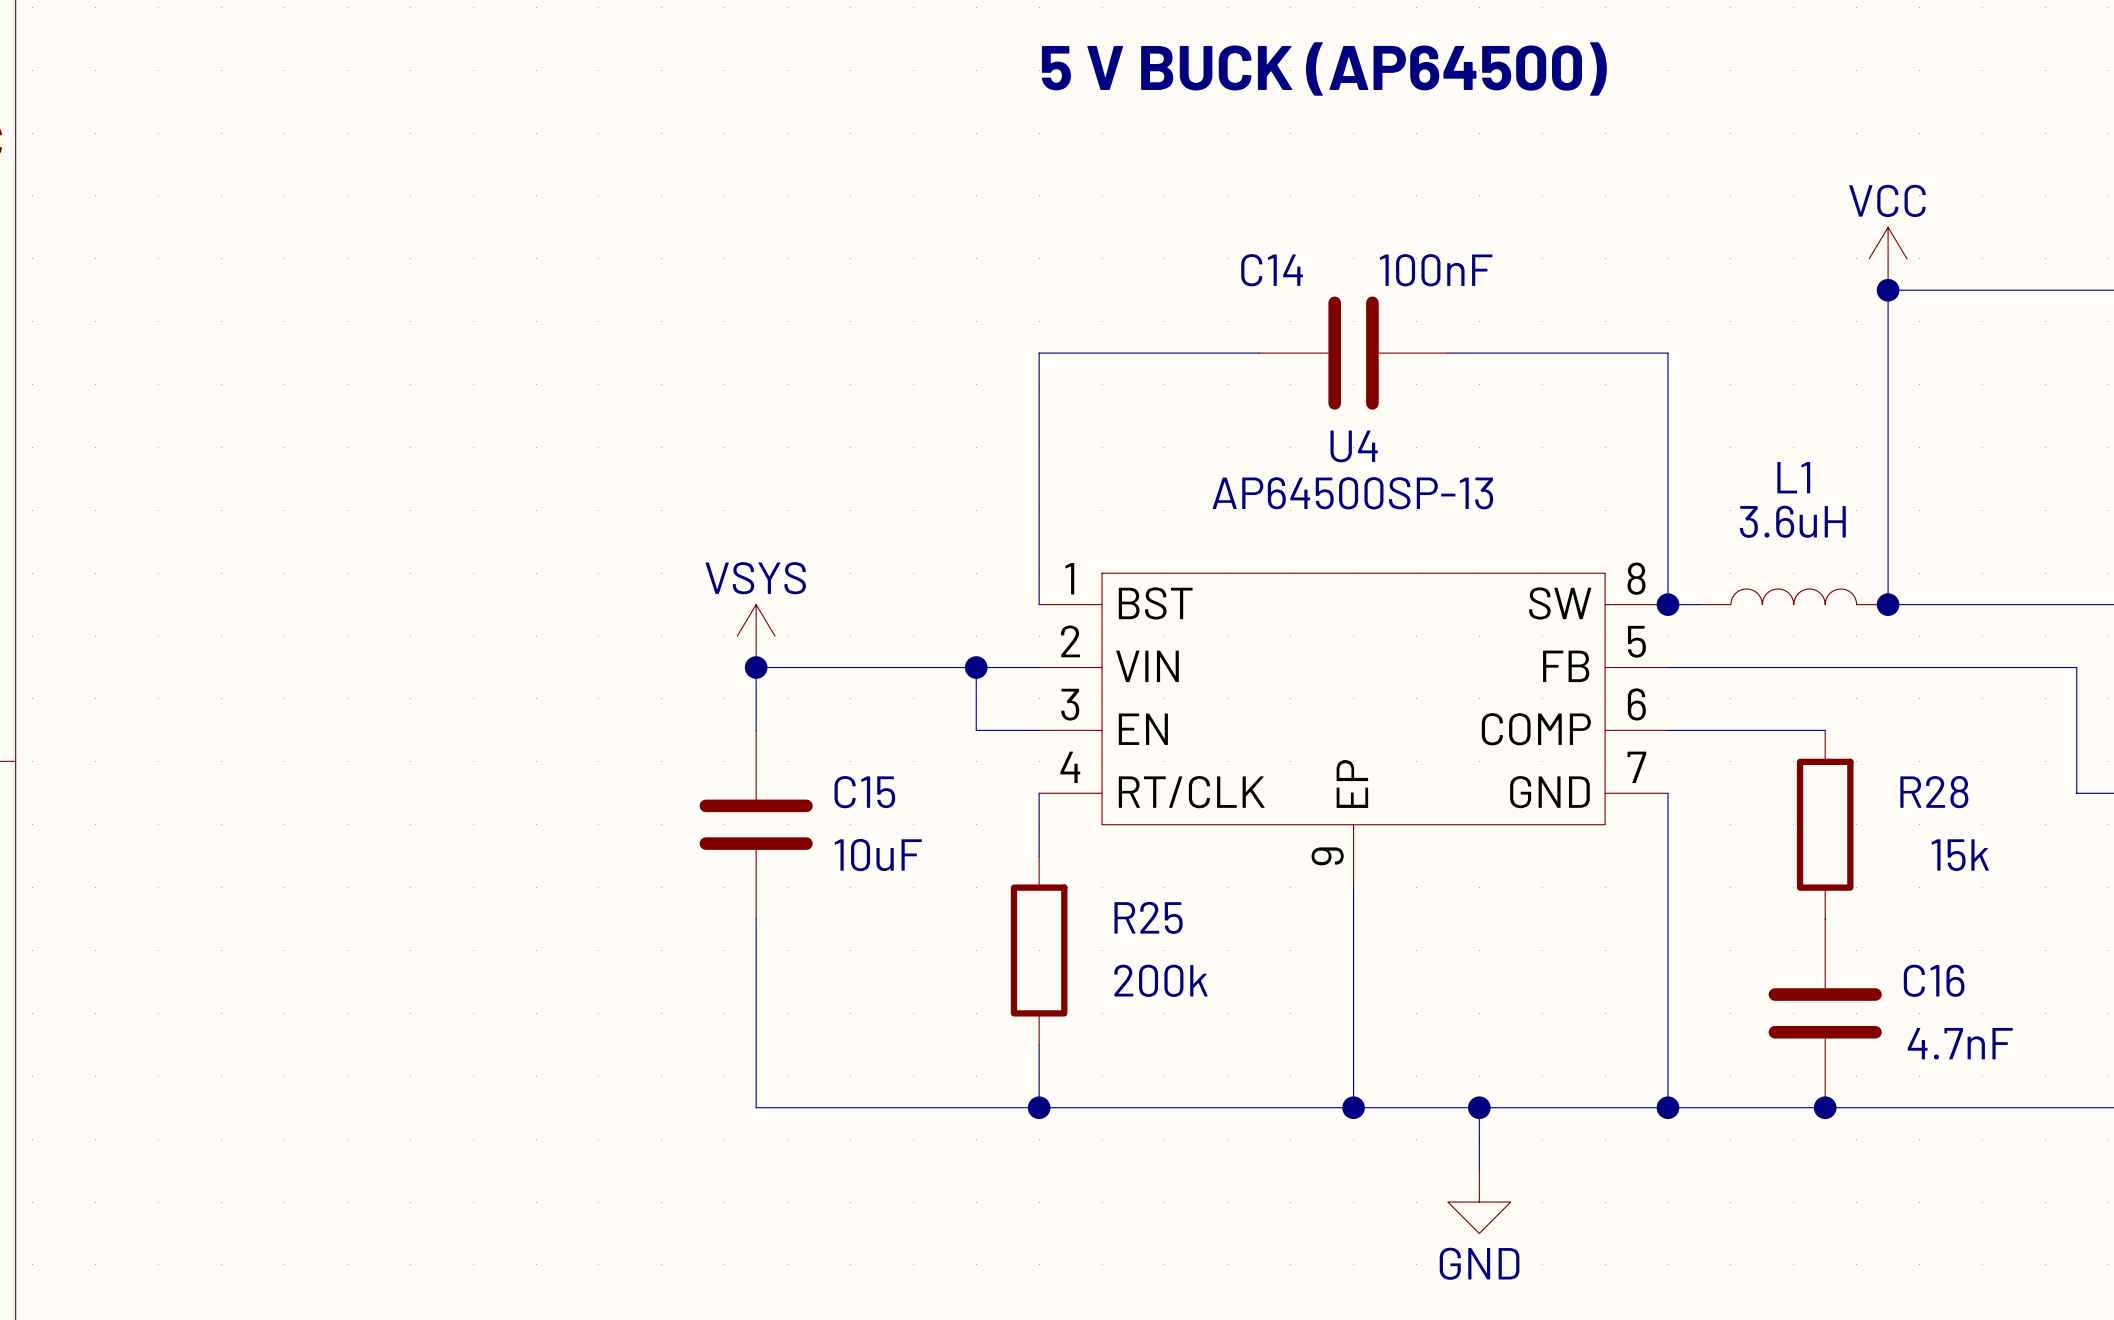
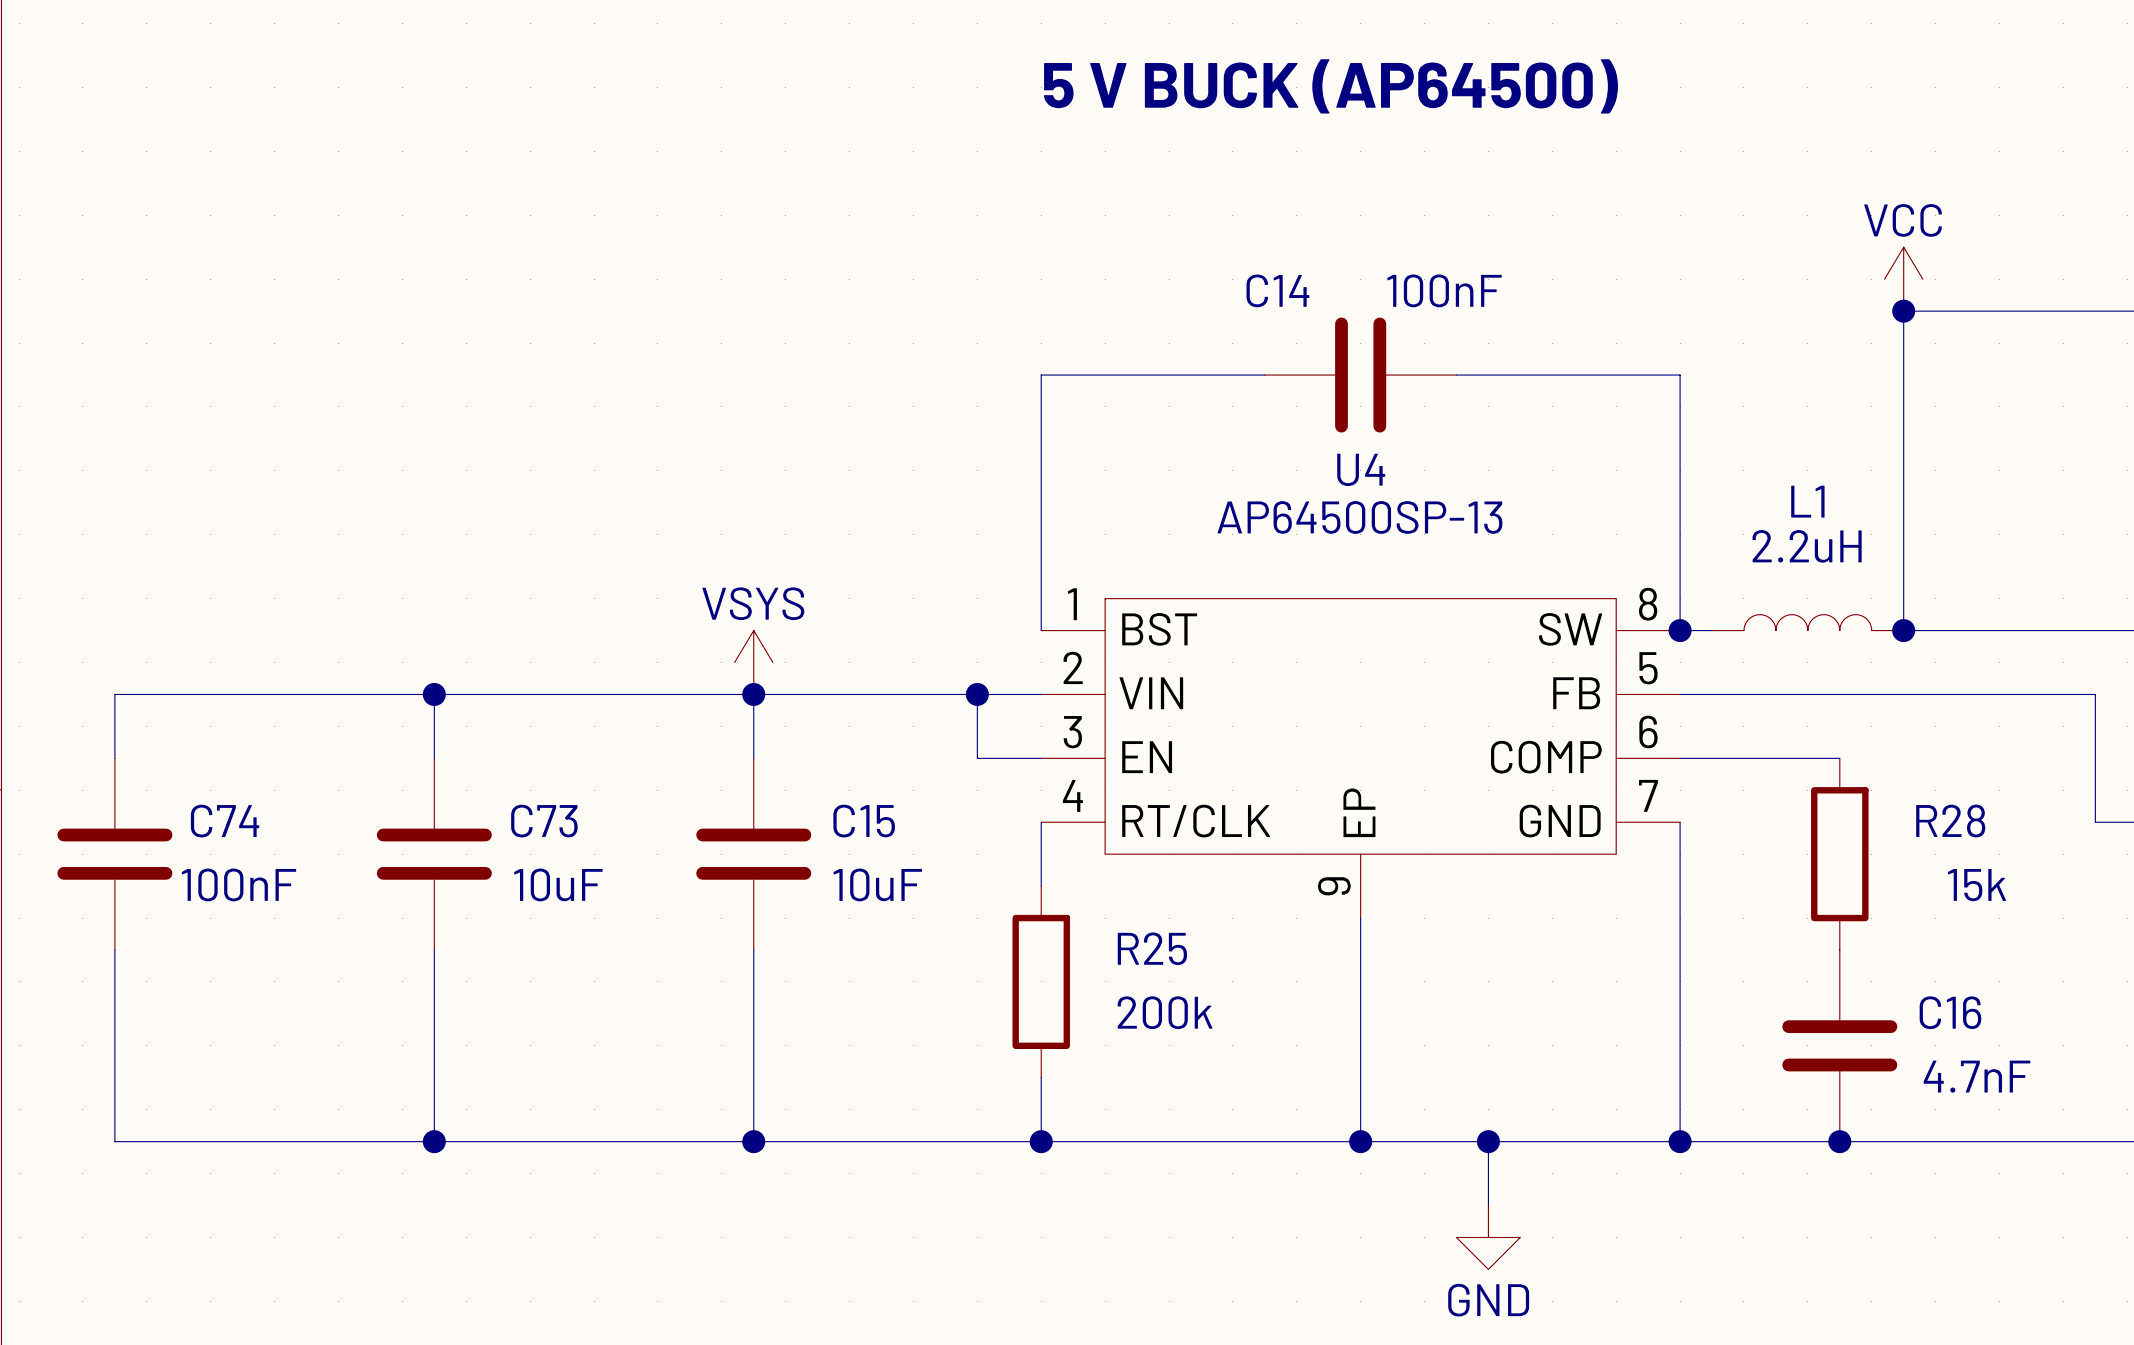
L1 value: 3.6uH (1792, 521) -> 2.2uH (1807, 546)
wire: none -> (434, 694) (434, 758)
junction: none -> (434, 694)
wire: none -> (753, 694) (114, 694) (114, 758)
C74: none -> 100nF (114, 854)
C73: none -> 10uF (434, 854)
wire: none -> (114, 950) (114, 1141) (753, 1141)
wire: none -> (434, 950) (434, 1141)
junction: none -> (434, 1141)
junction: none -> (753, 1141)

